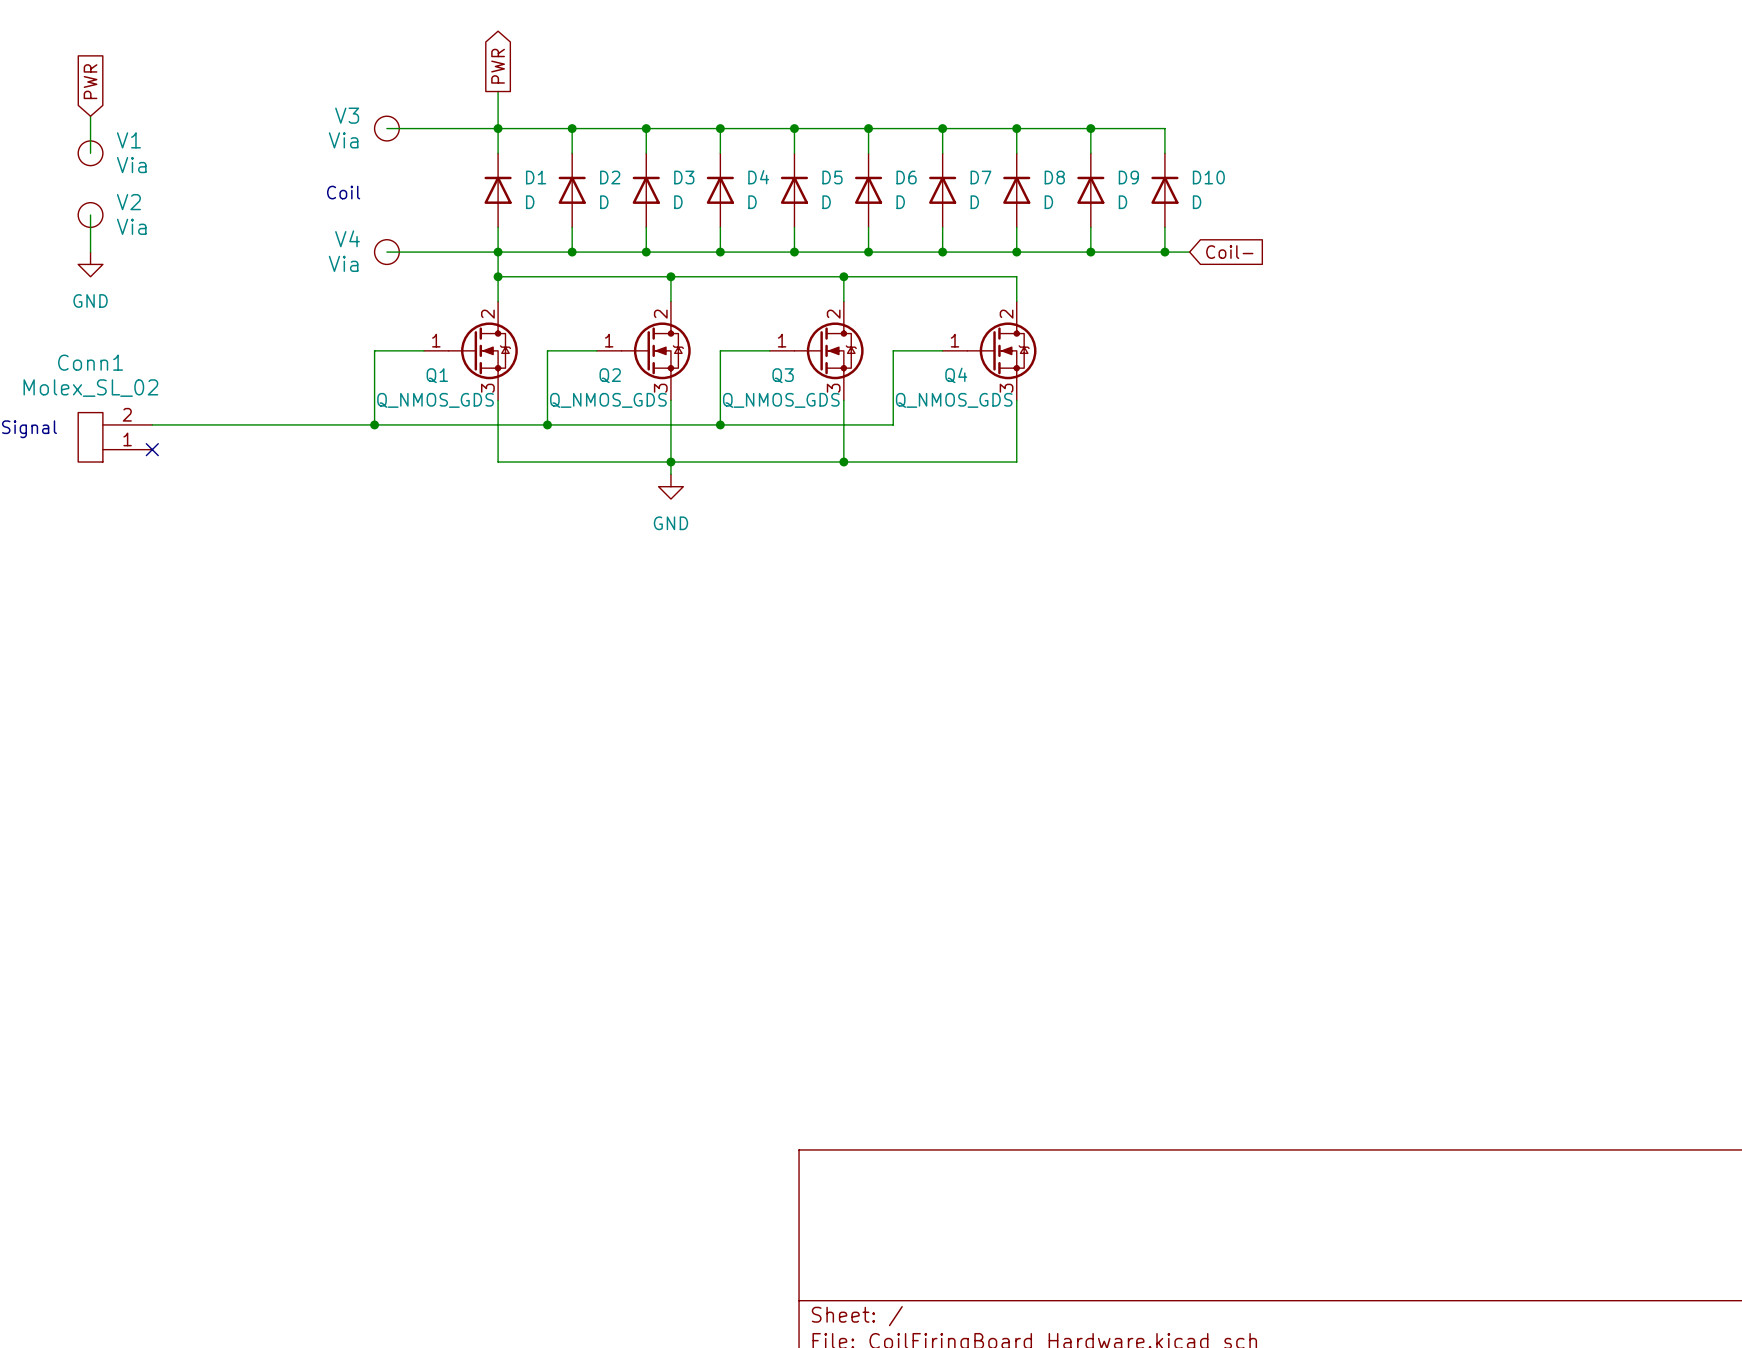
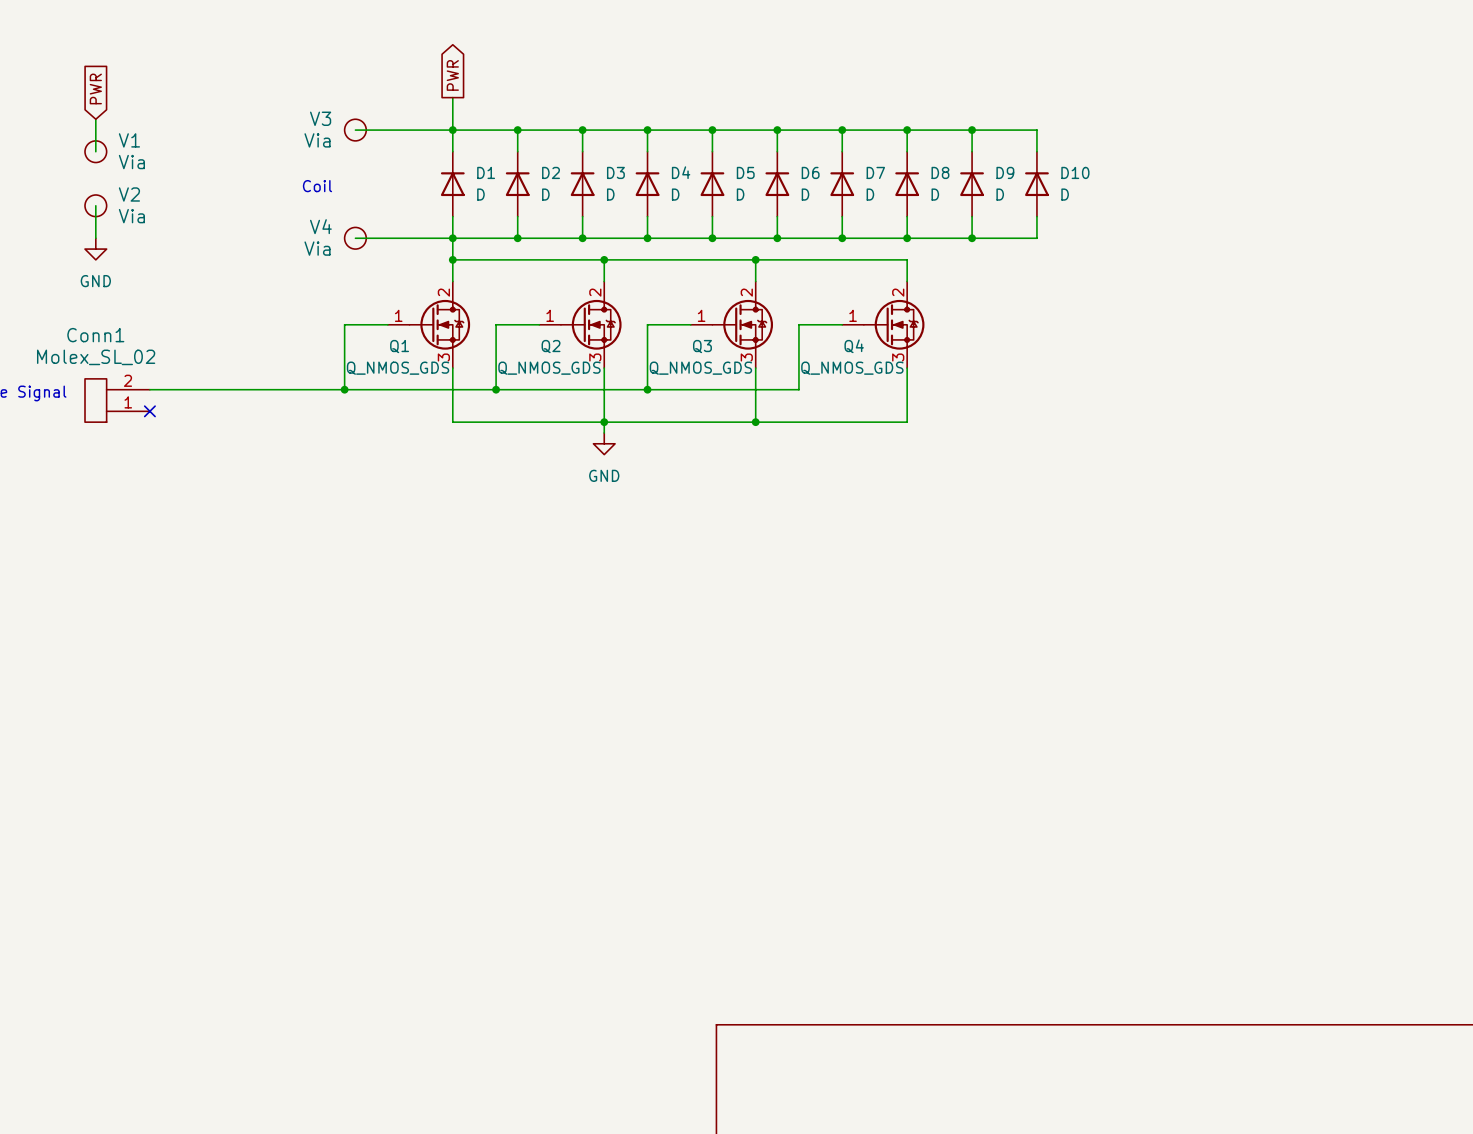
wire: (1164, 252) (1189, 252) -> none
junction: (1164, 252) -> none
global label: Coil- (1229, 252) -> none

